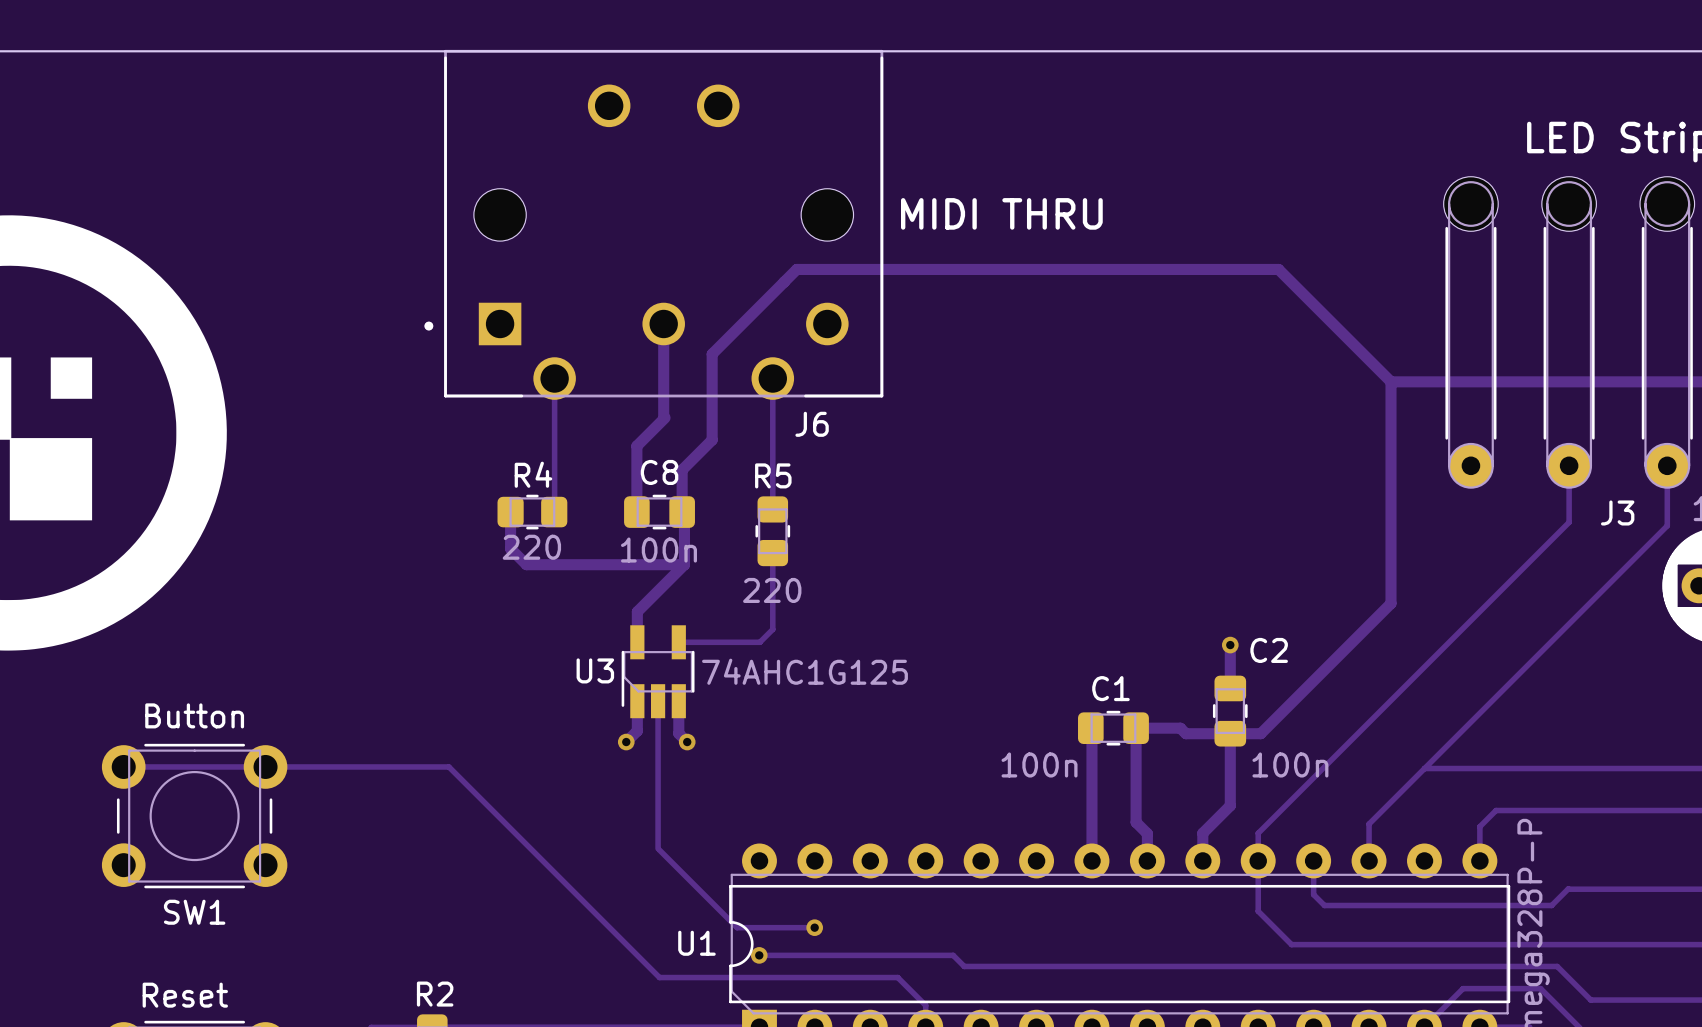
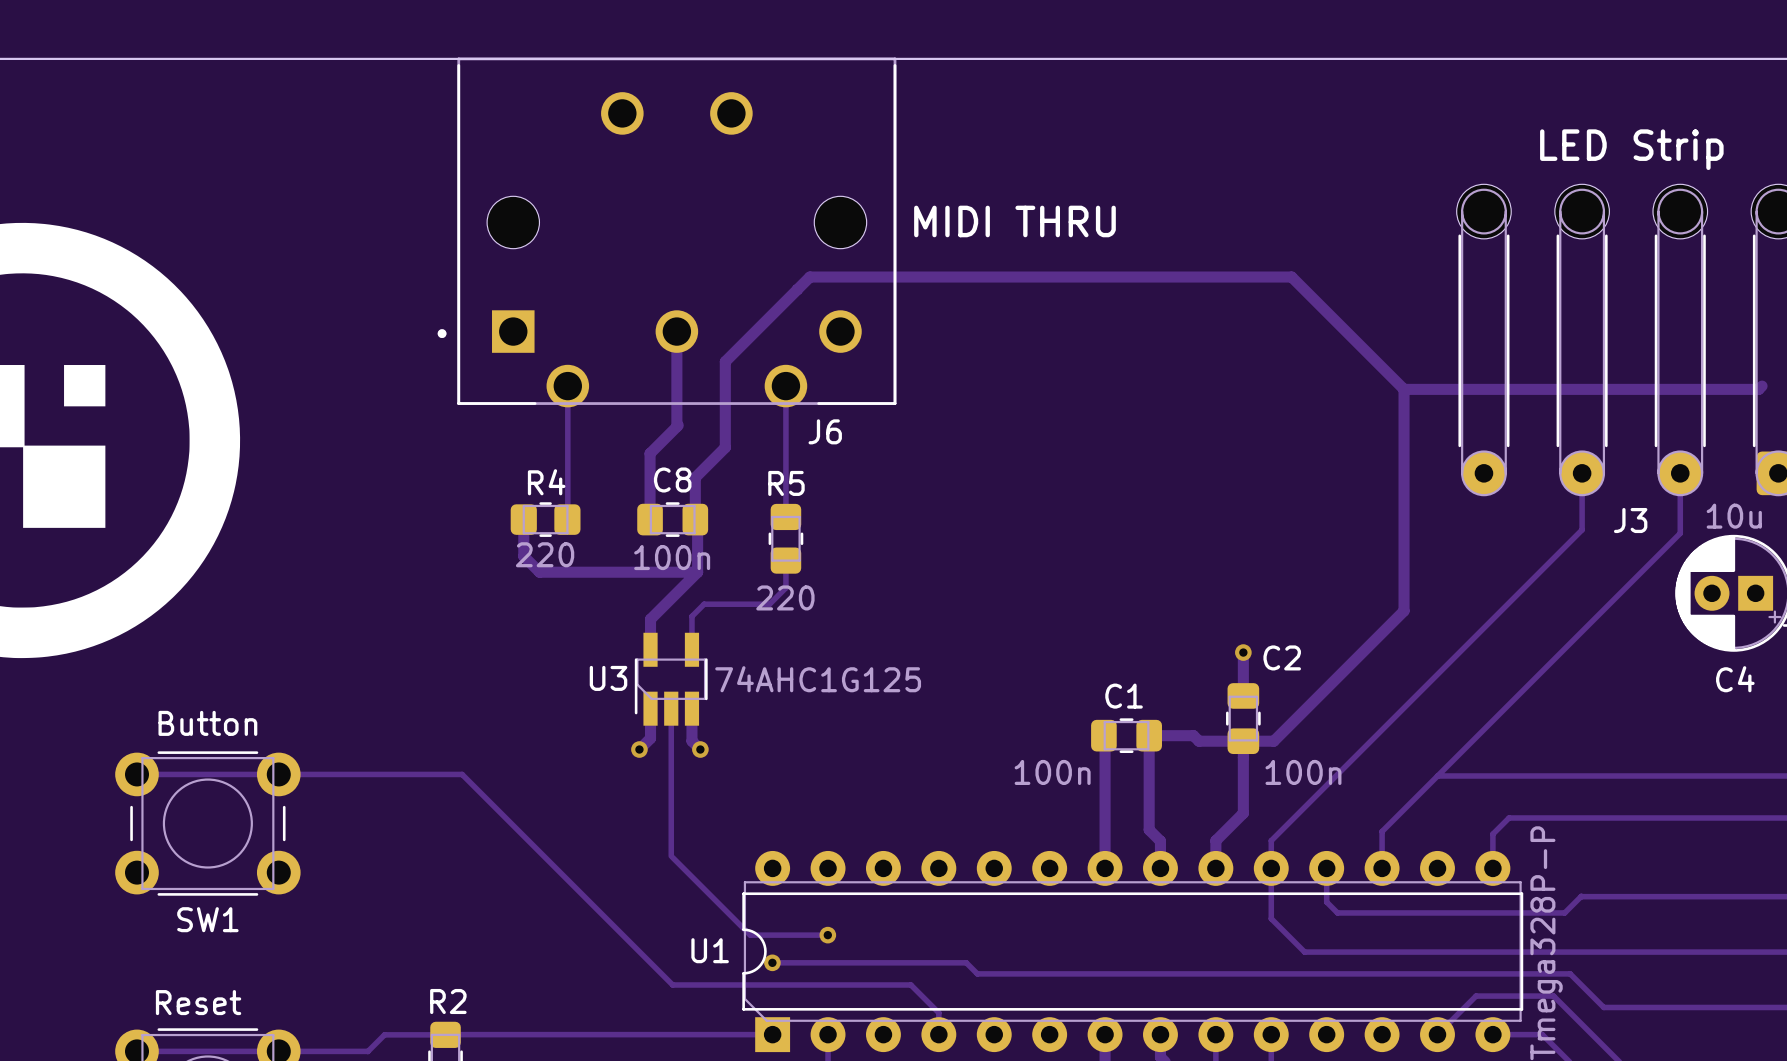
track: (772, 580) (772, 629) (759, 642) (678, 642) -> (785, 587) (769, 604) (704, 604) (691, 616) (691, 649)

